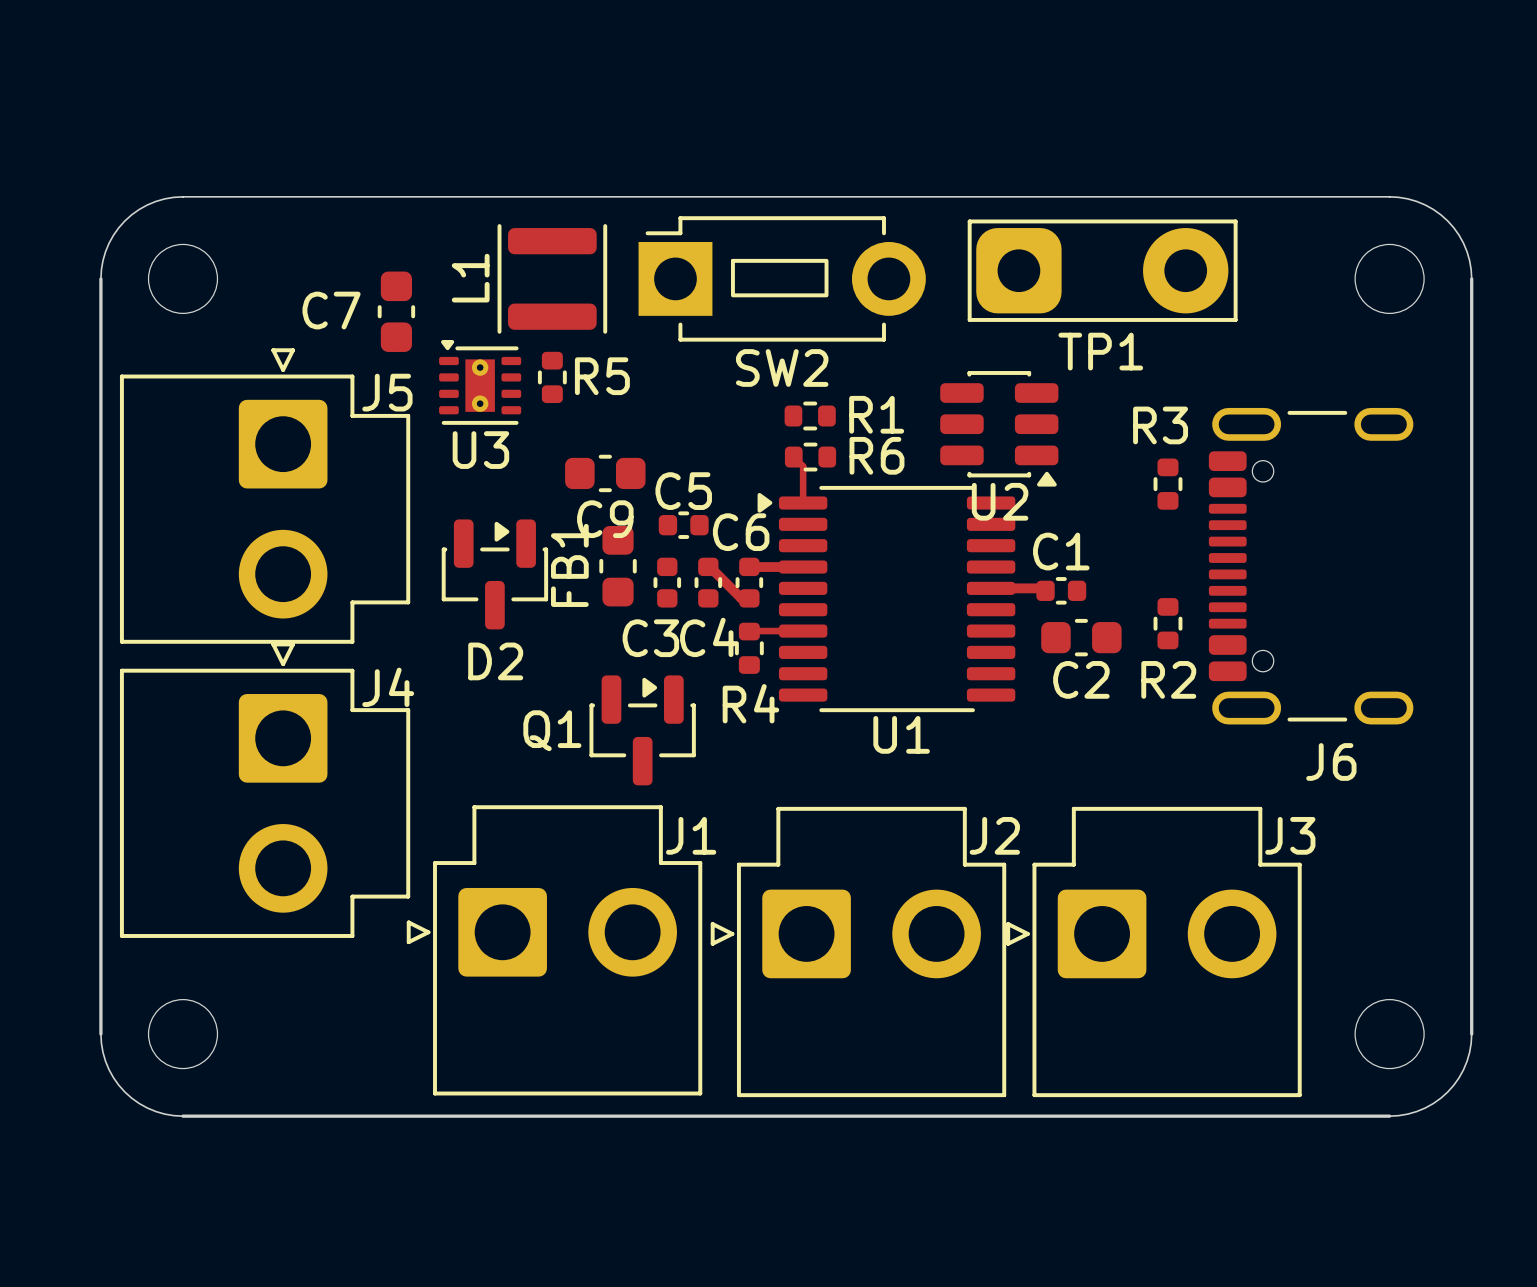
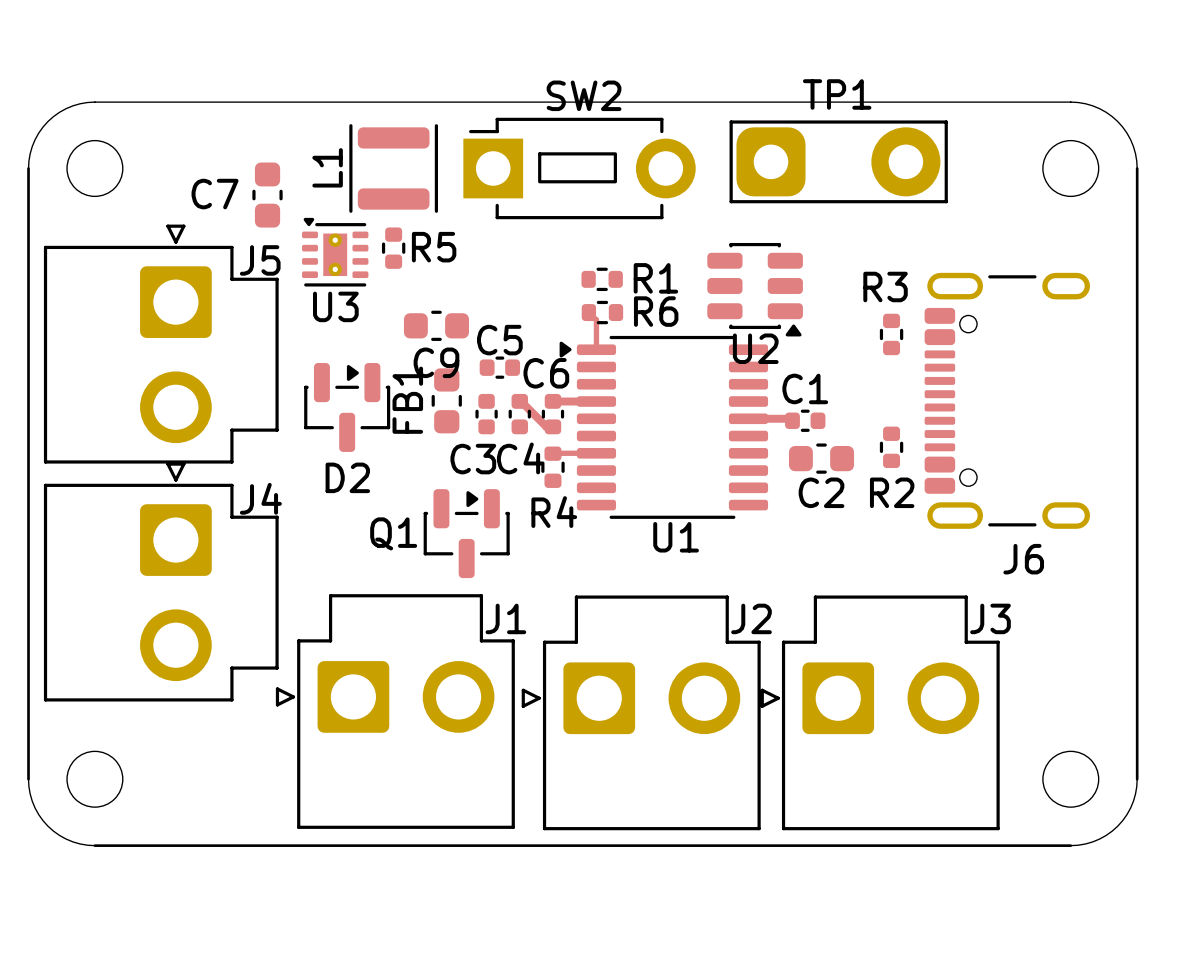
TP1 name position: TP1 (1100, 351) -> TP1 (837, 94)
SW2 name position: SW2 (782, 367) -> SW2 (584, 95)

